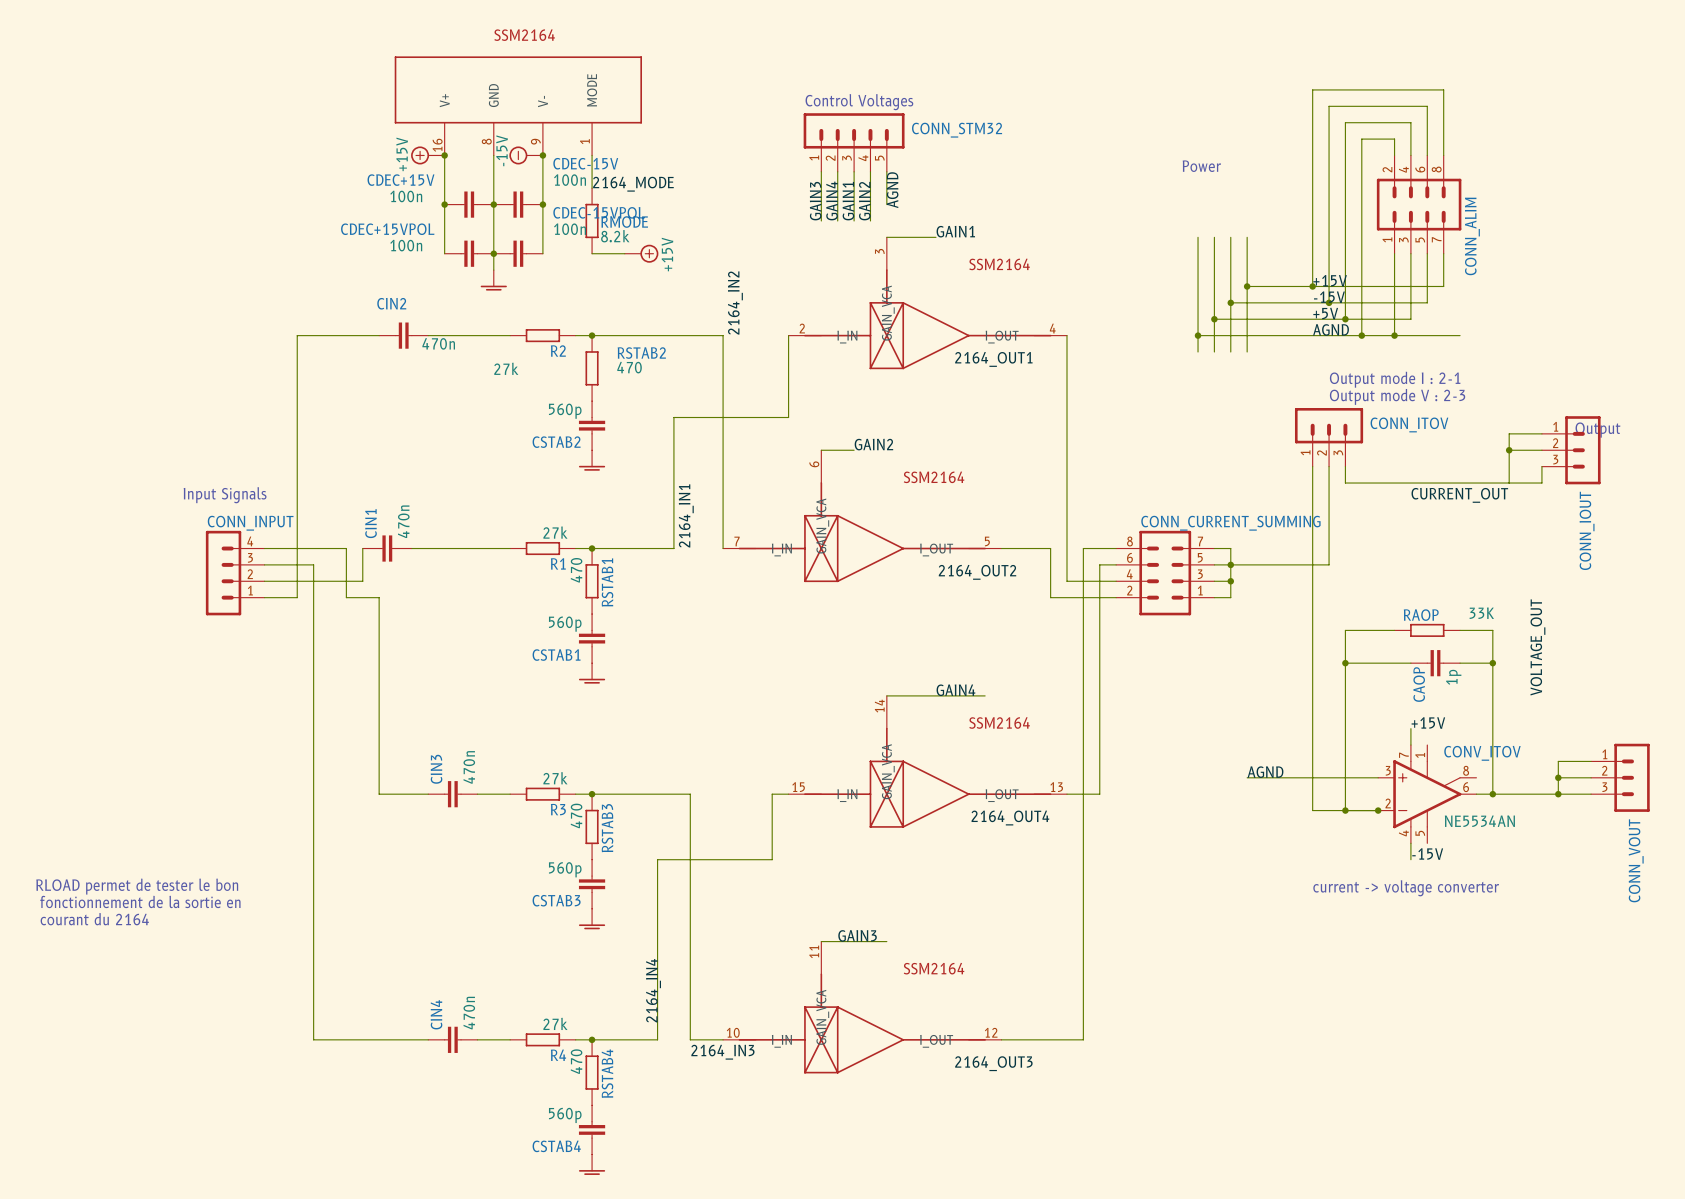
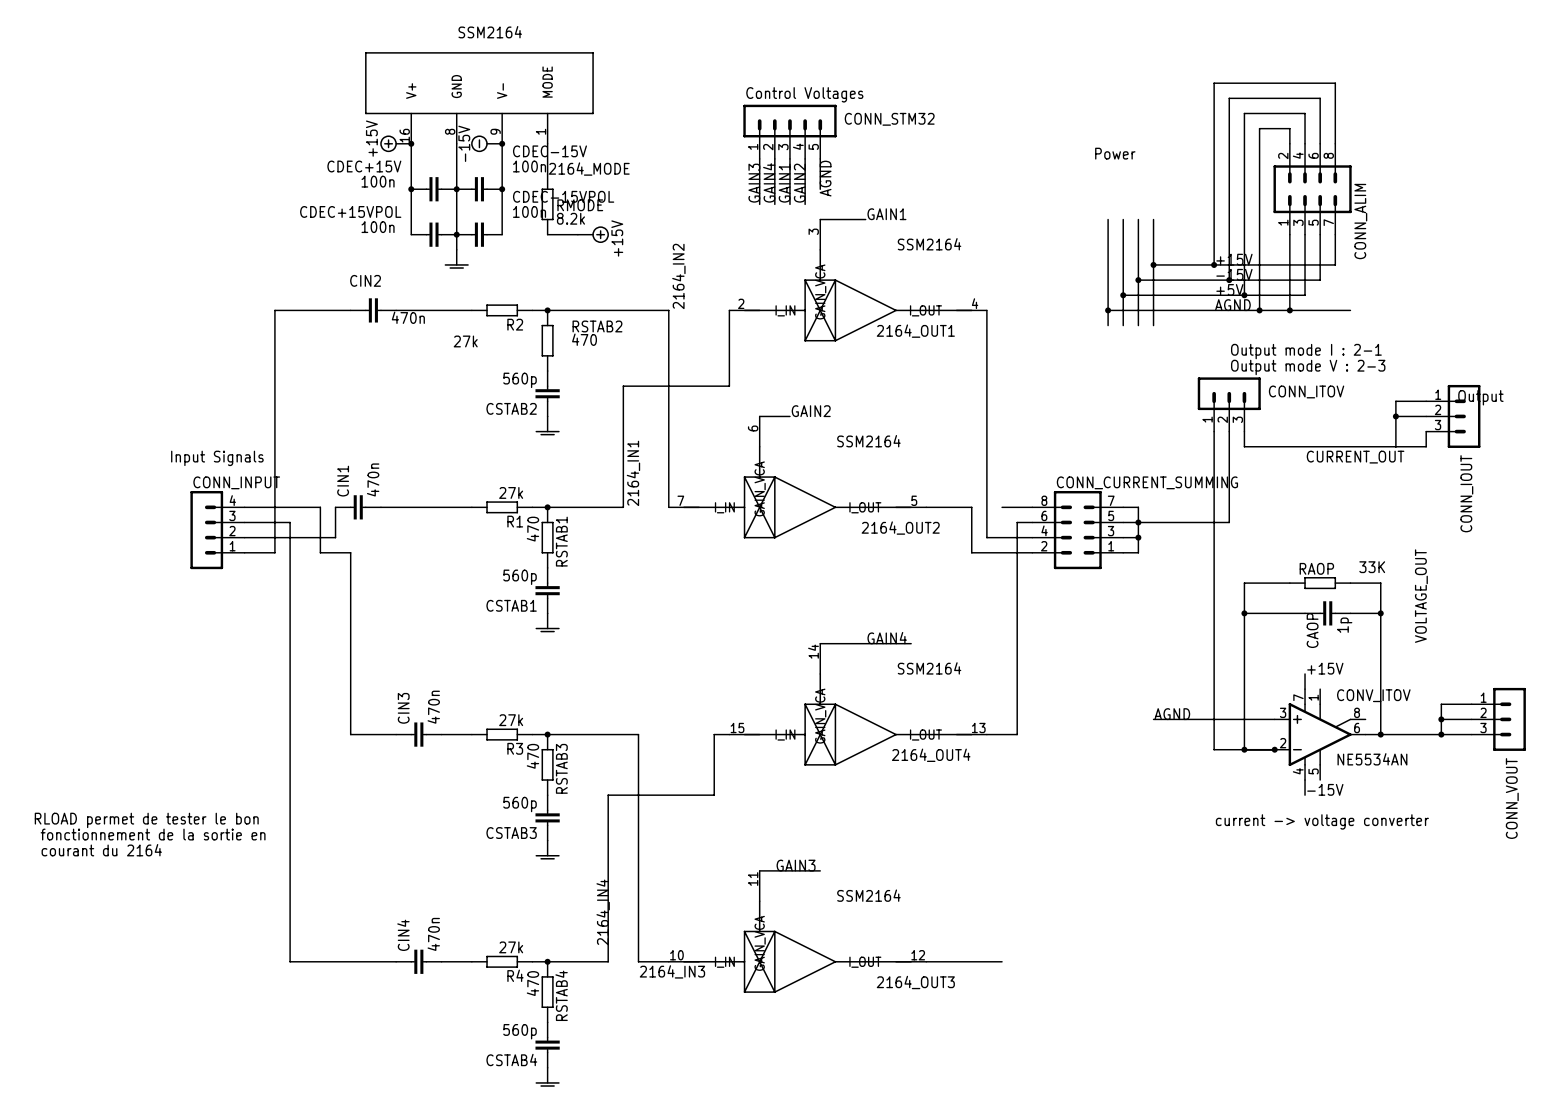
wire: (1083, 548) (1083, 1039) -> none

